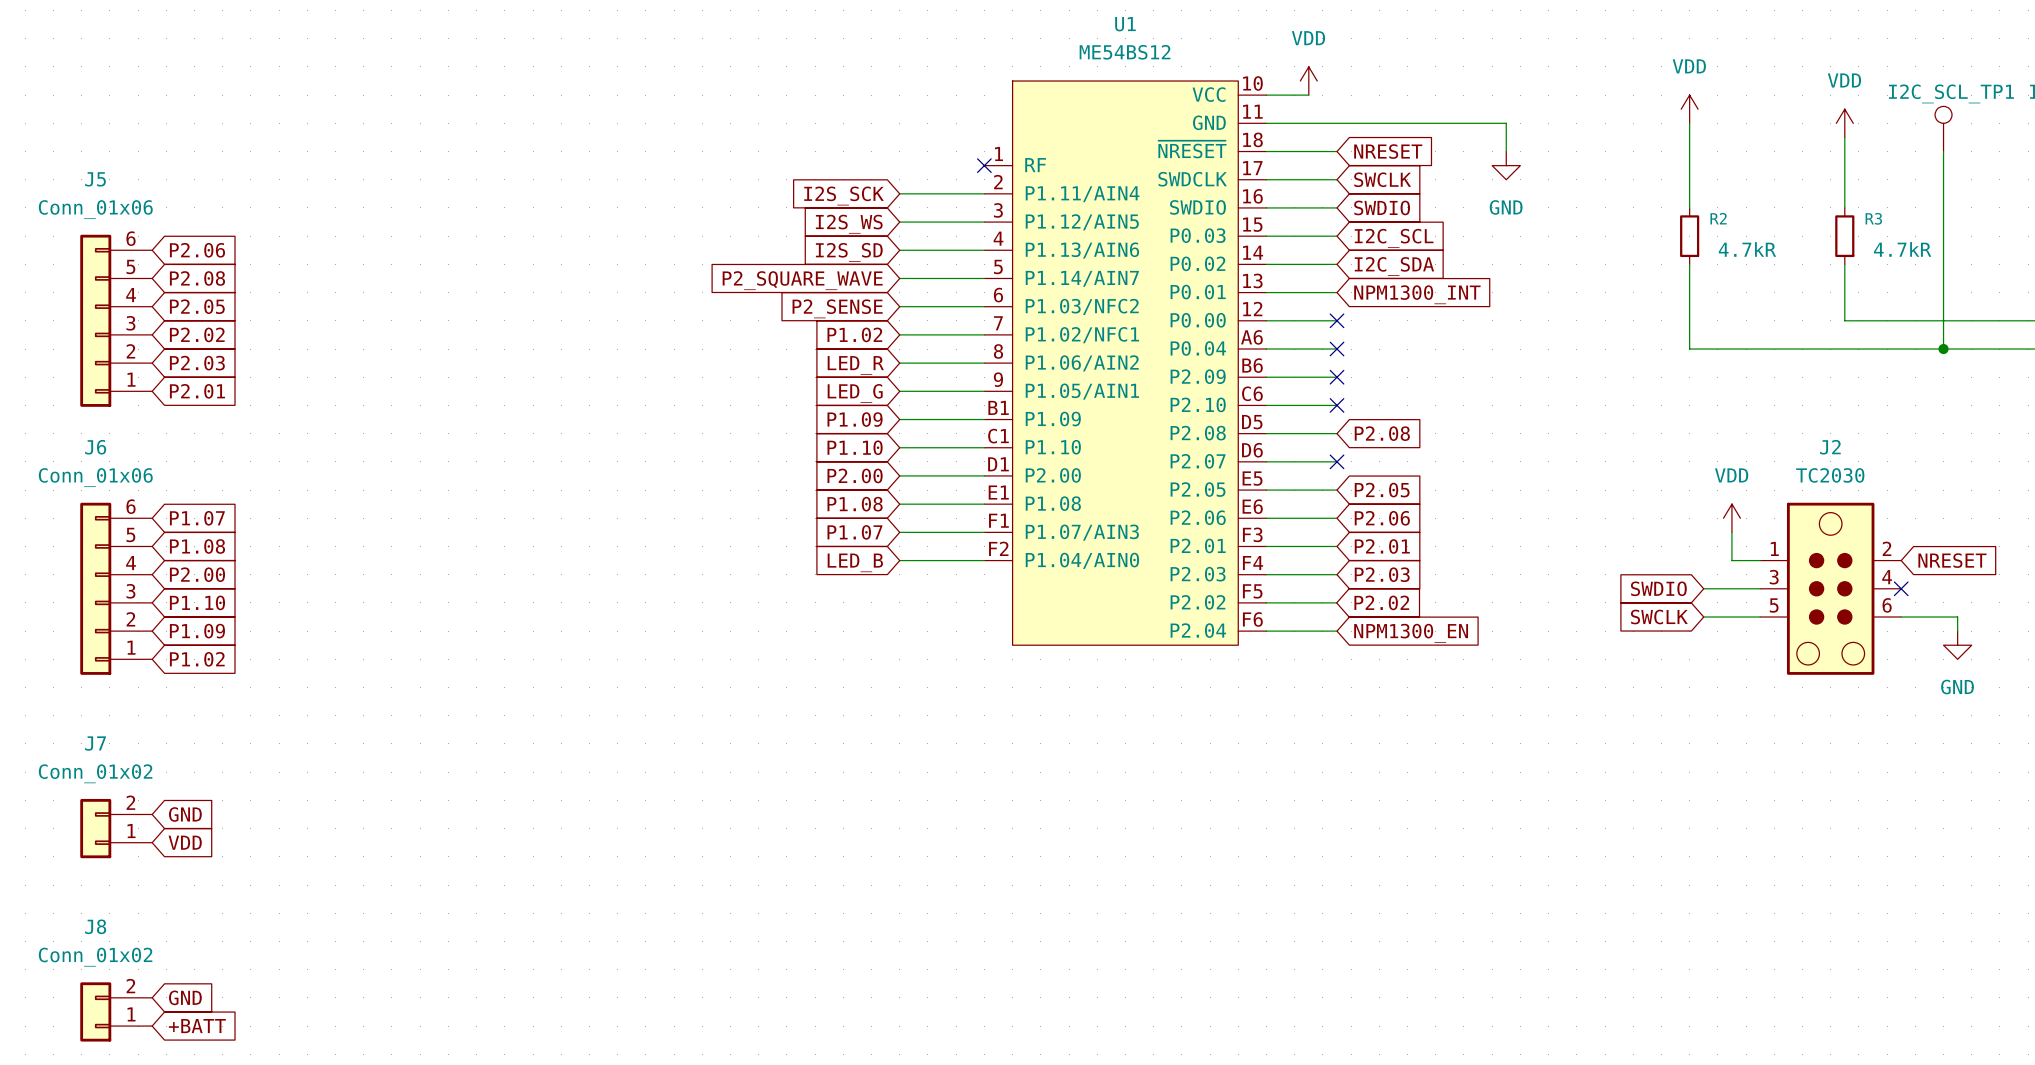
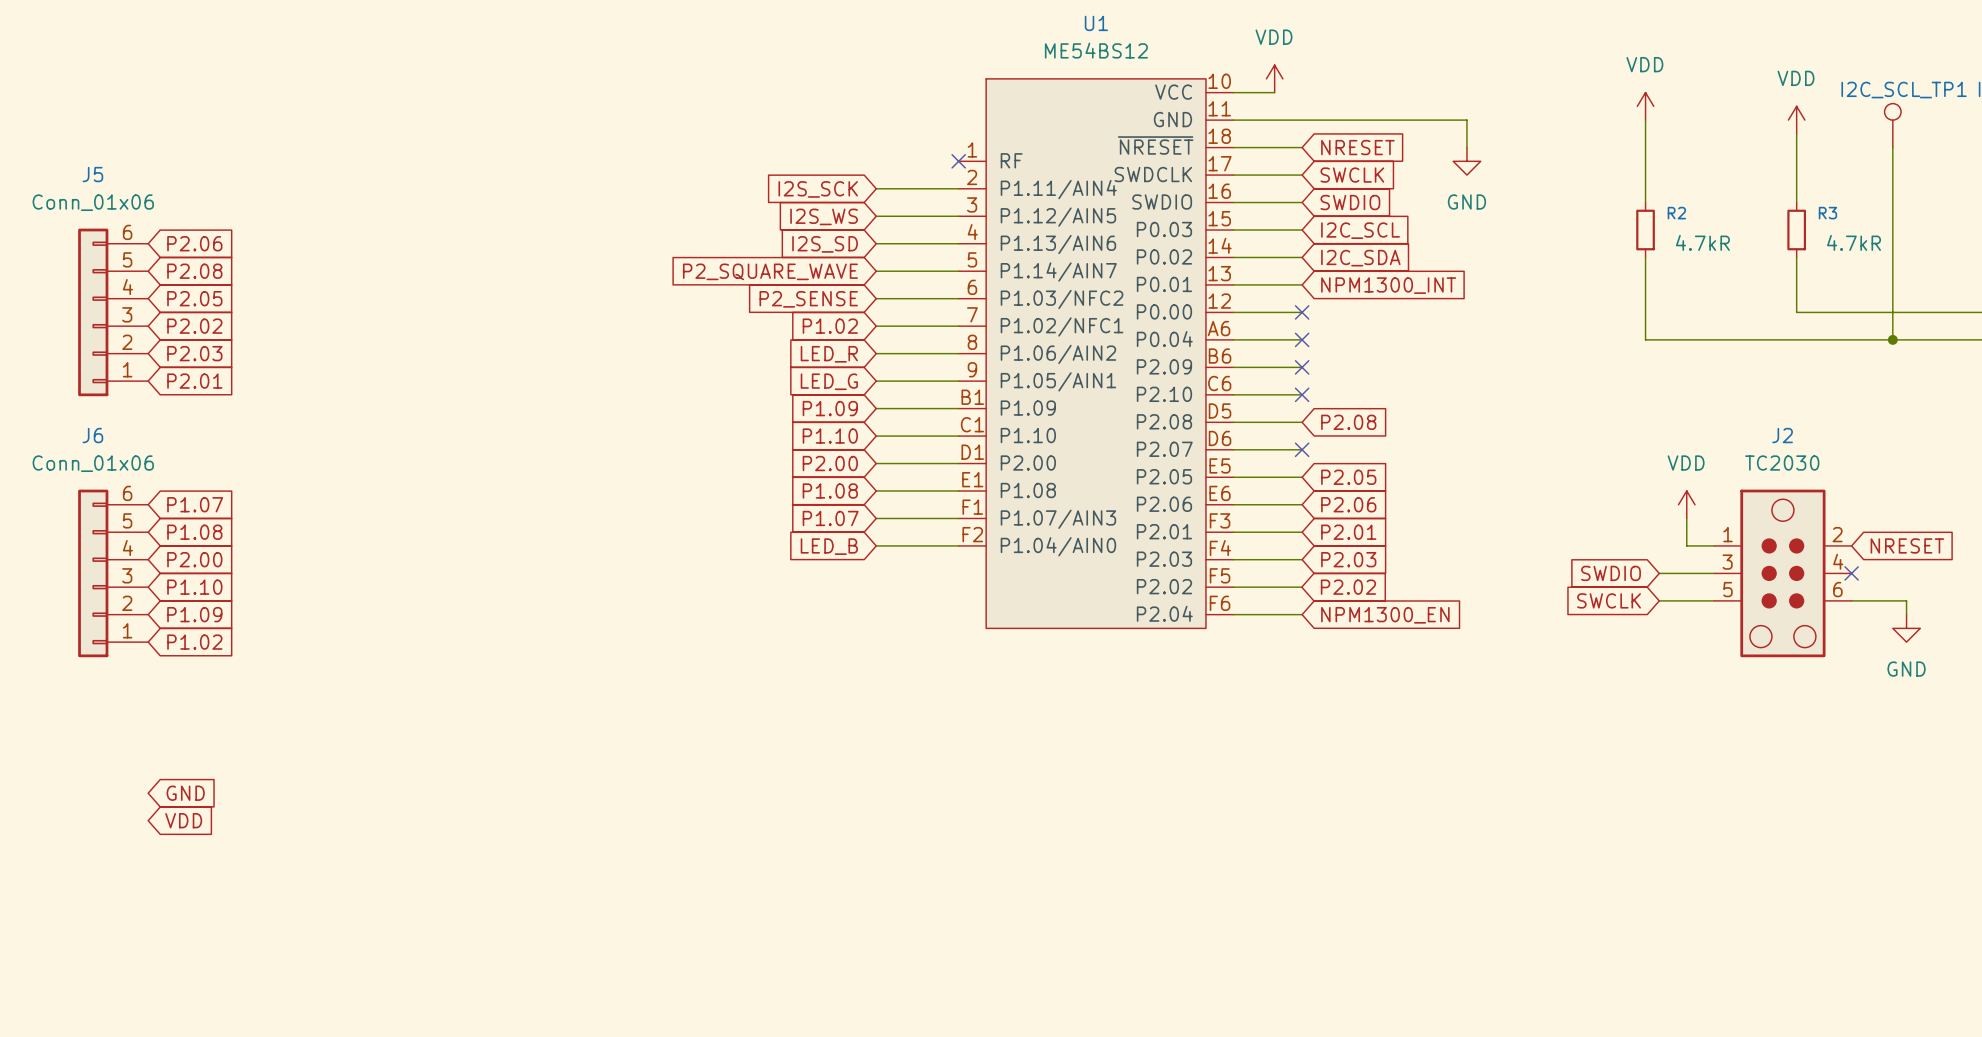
J7: Conn_01x02 (116, 828) -> none
global label: GND (185, 997) -> none
J8: Conn_01x02 (116, 1011) -> none
global label: +BATT (197, 1026) -> none

